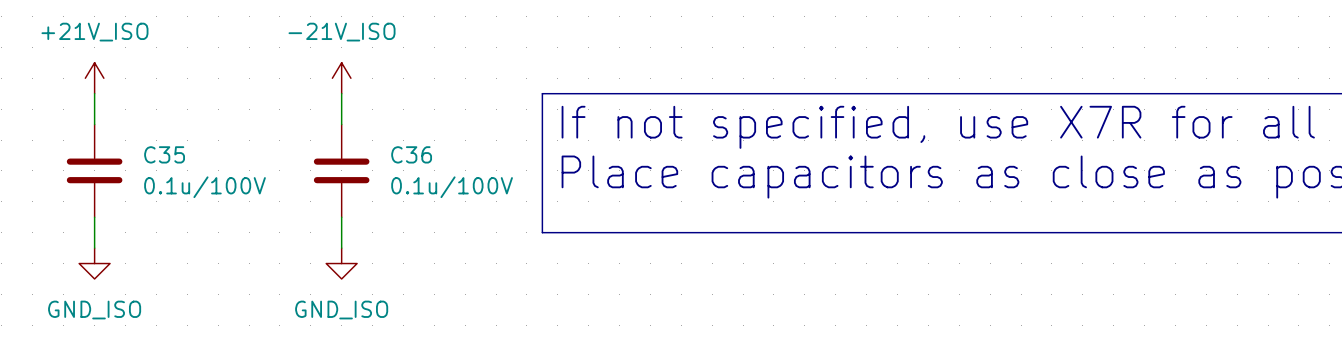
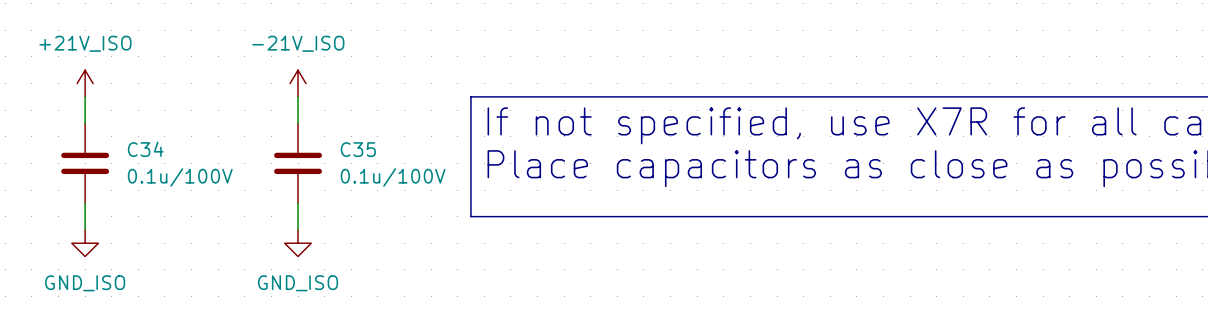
C35 name: C35 (164, 154) -> C34 (145, 149)
C36 name: C36 (411, 154) -> C35 (358, 149)

